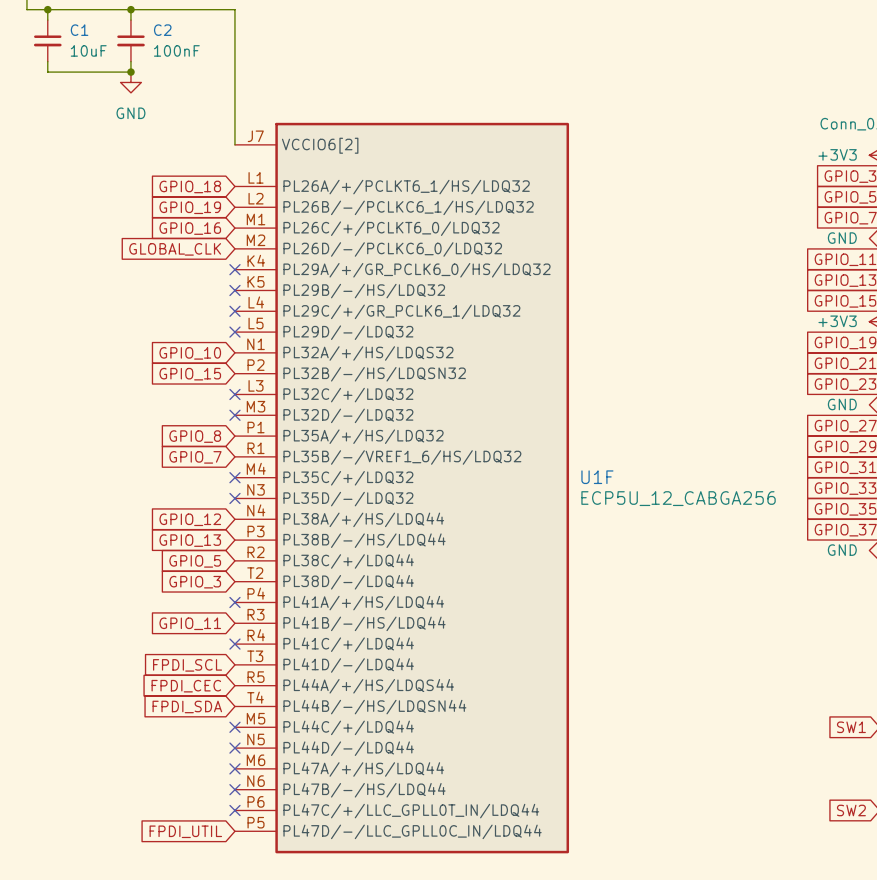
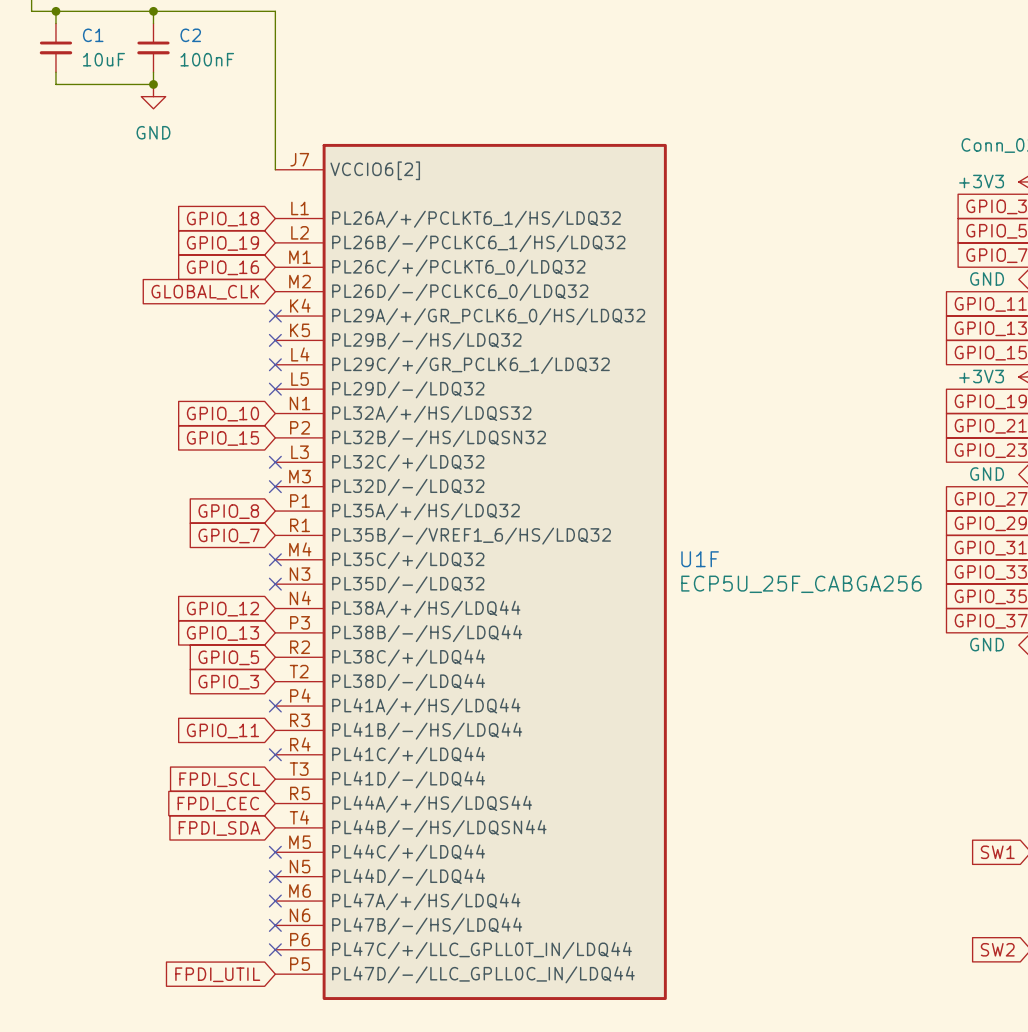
U1F value: ECP5U_12_CABGA256 (678, 498) -> ECP5U_25F_CABGA256 (801, 584)

